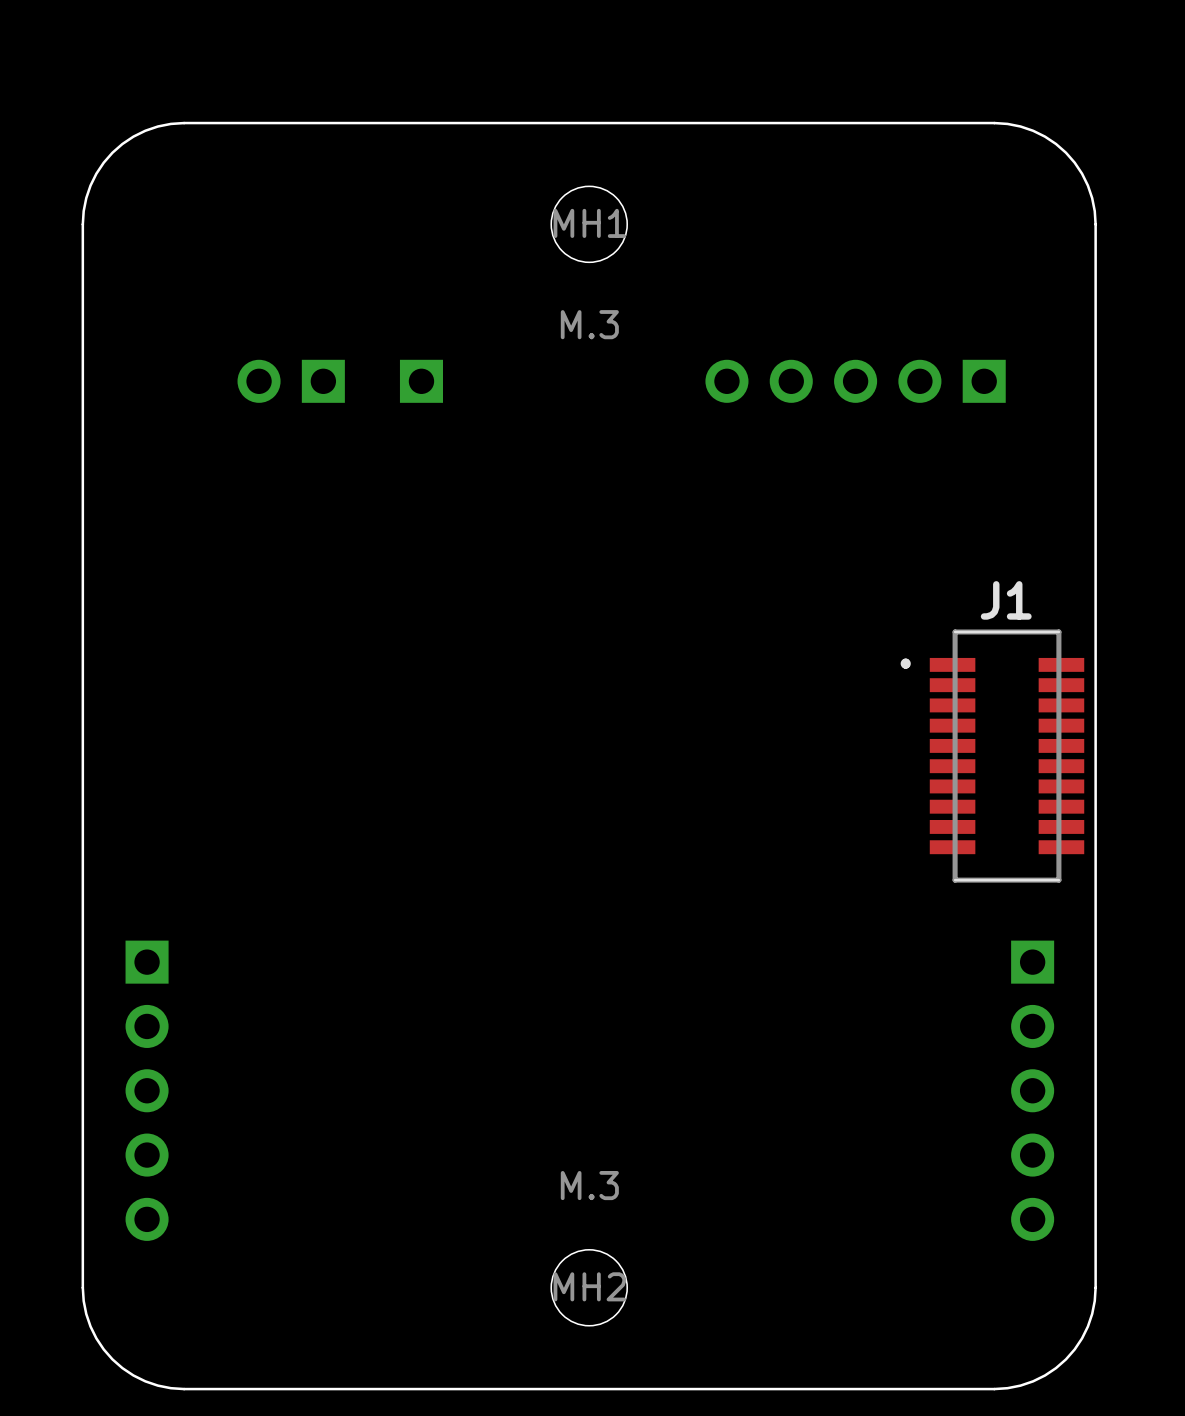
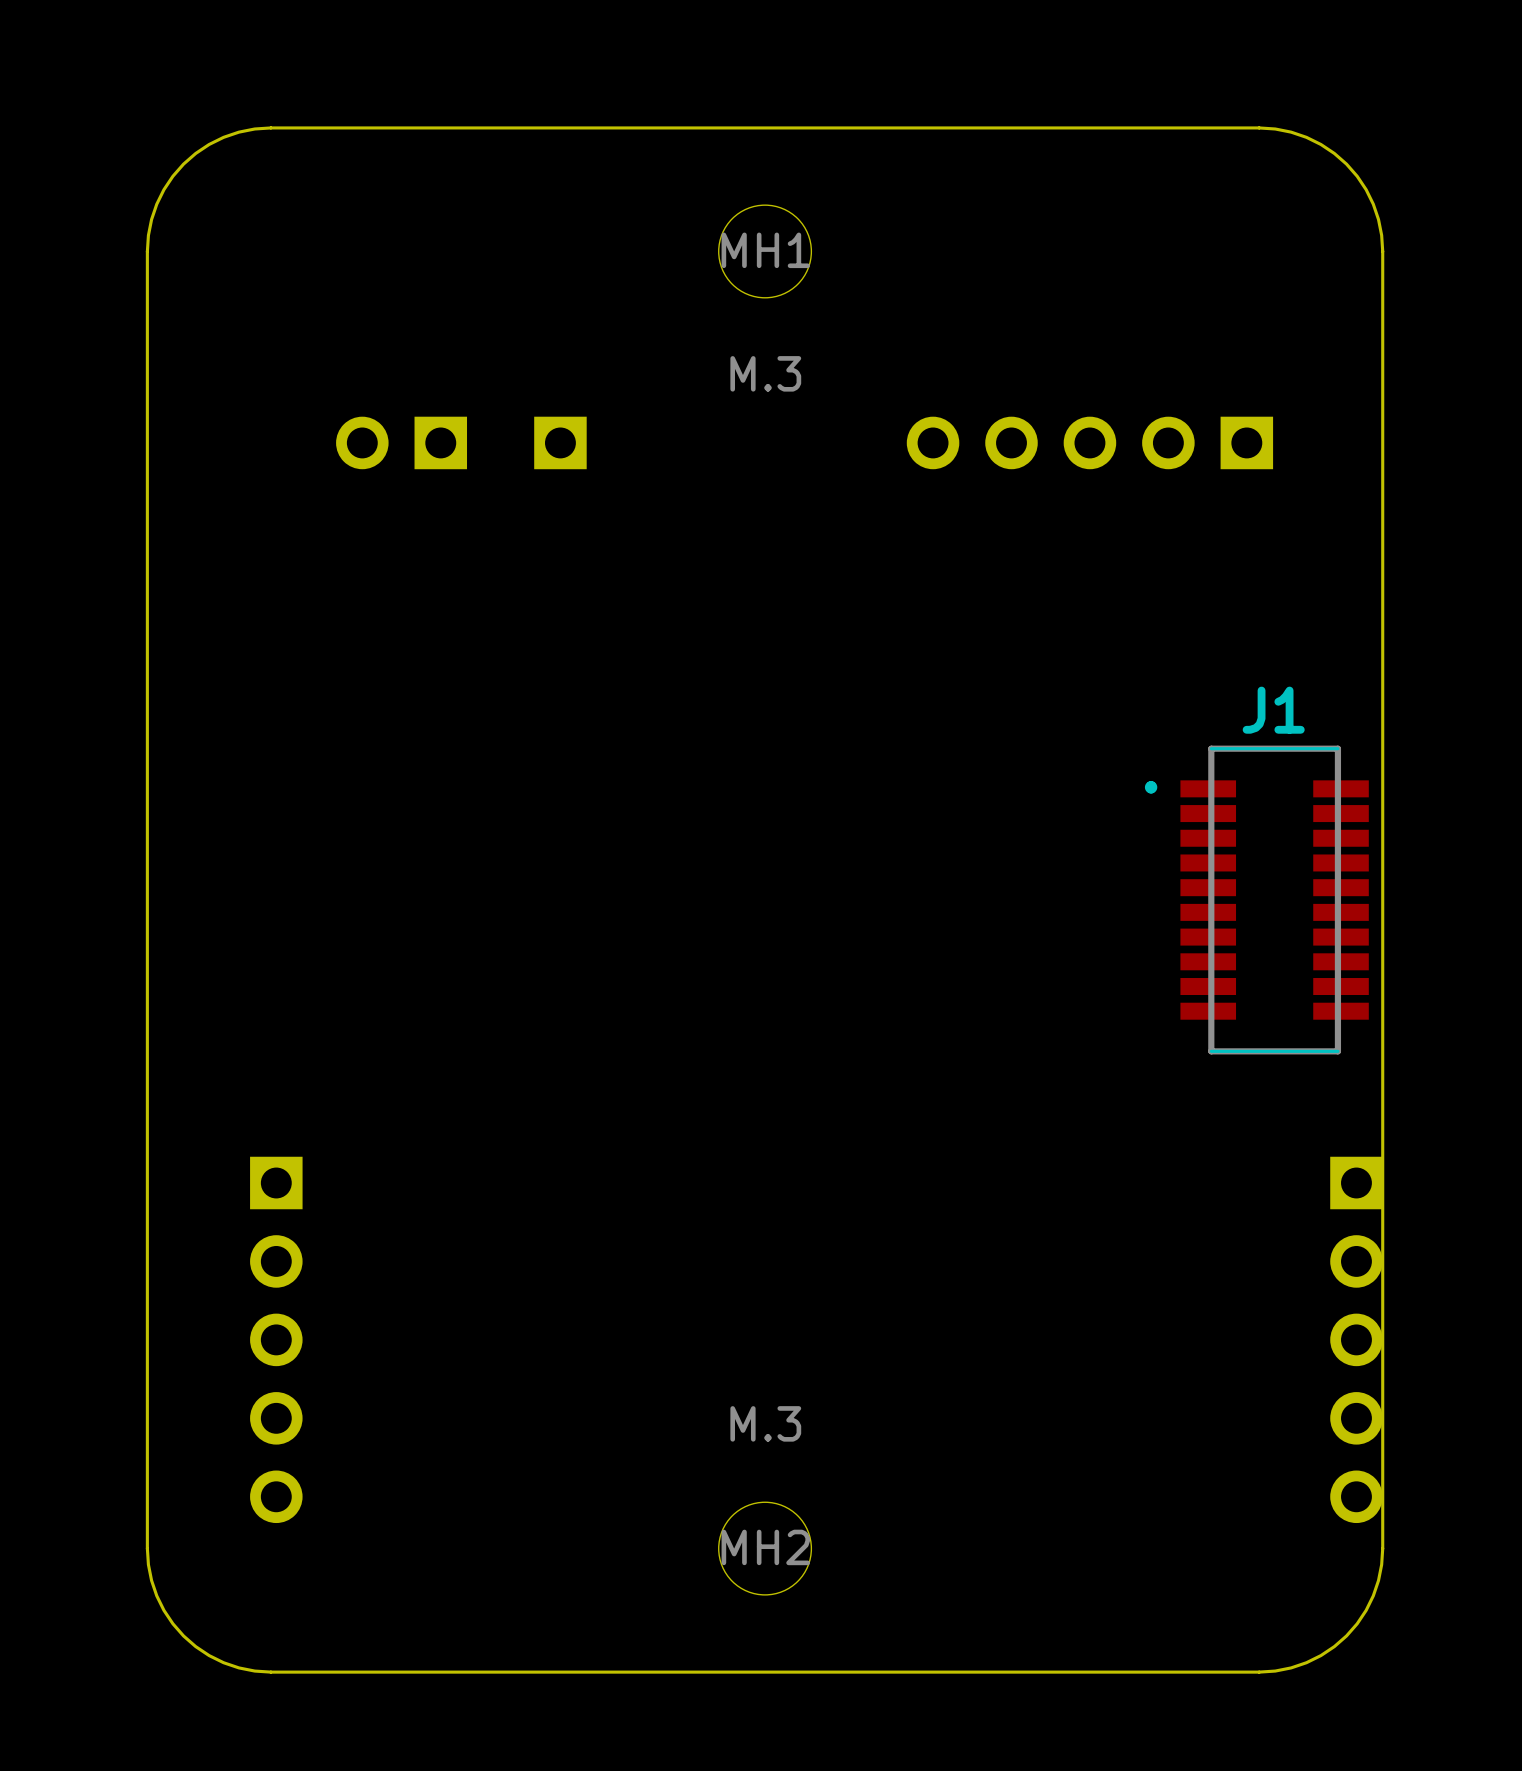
part position: (147, 1090) -> (276, 1339)
part position: (1032, 1090) -> (1356, 1339)

